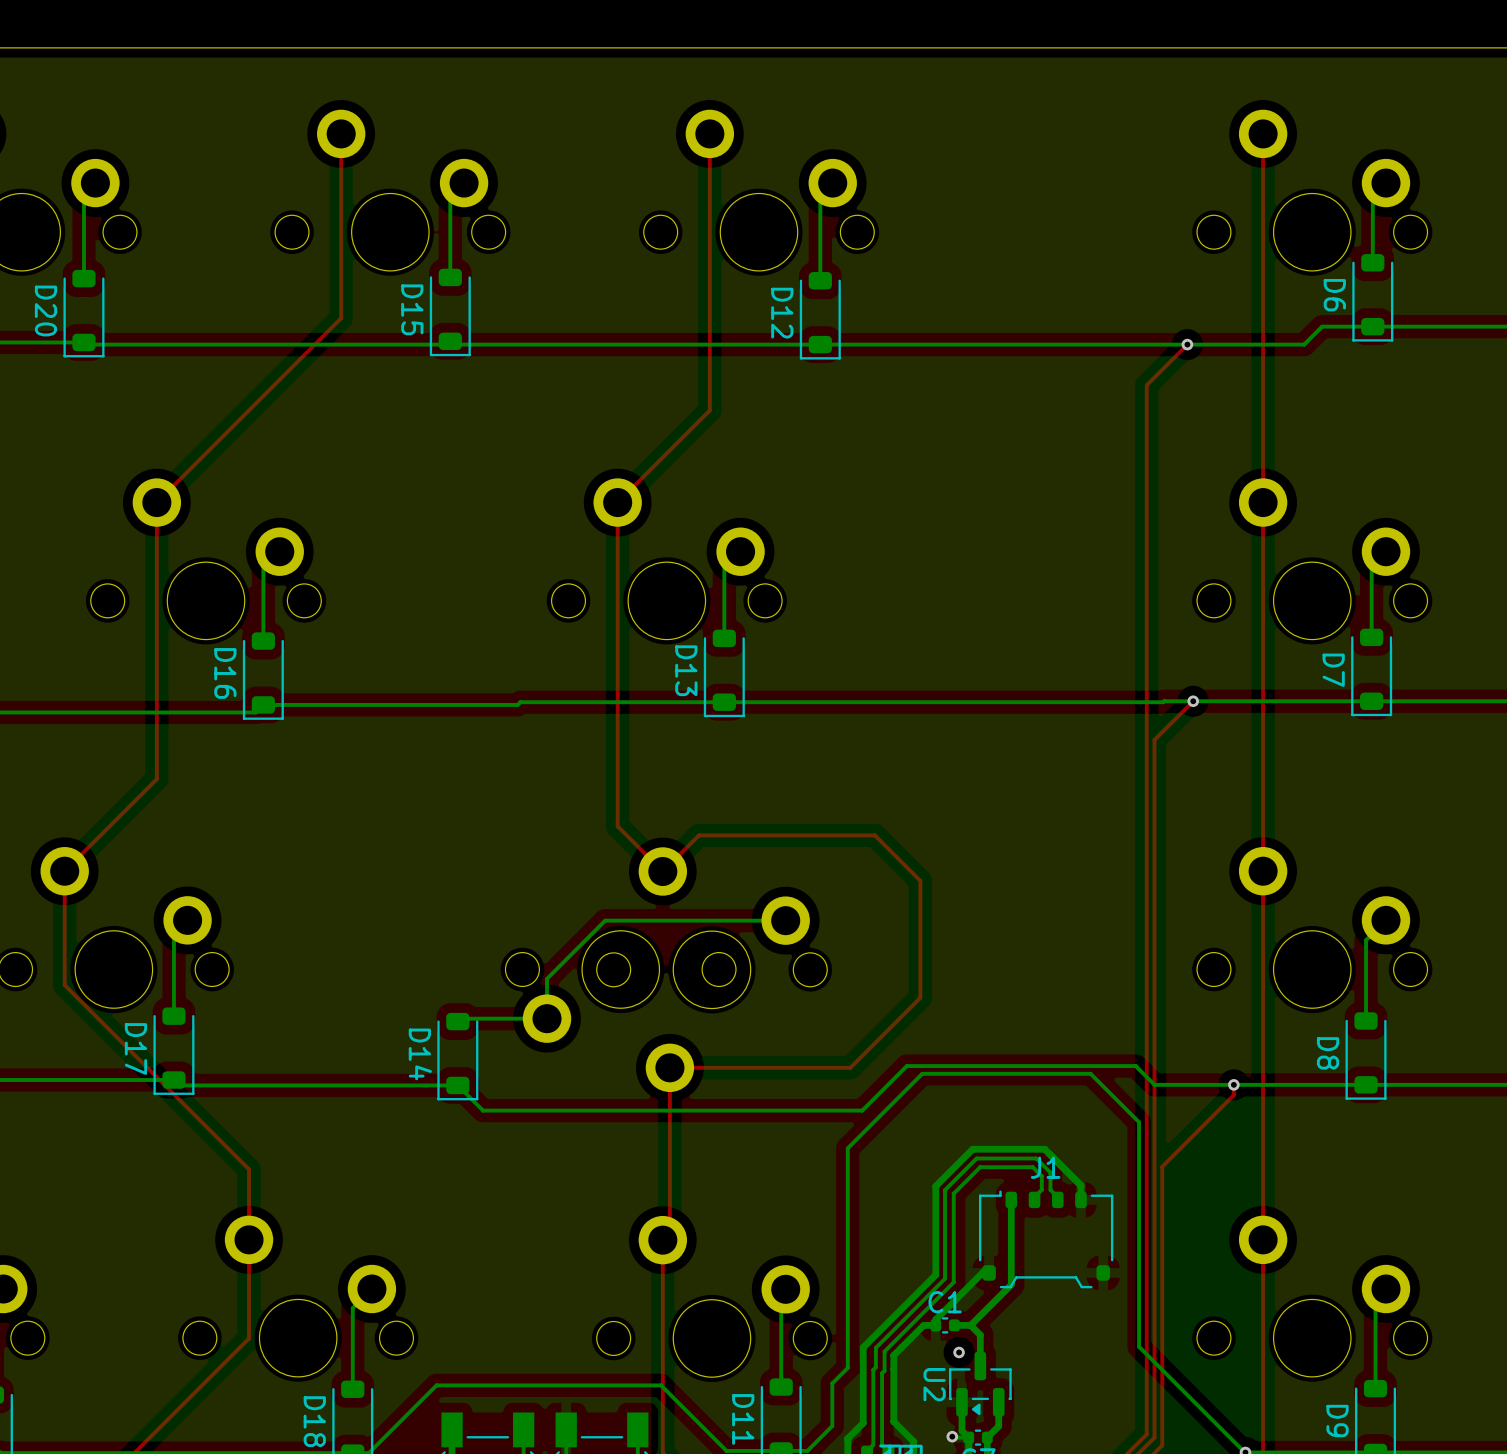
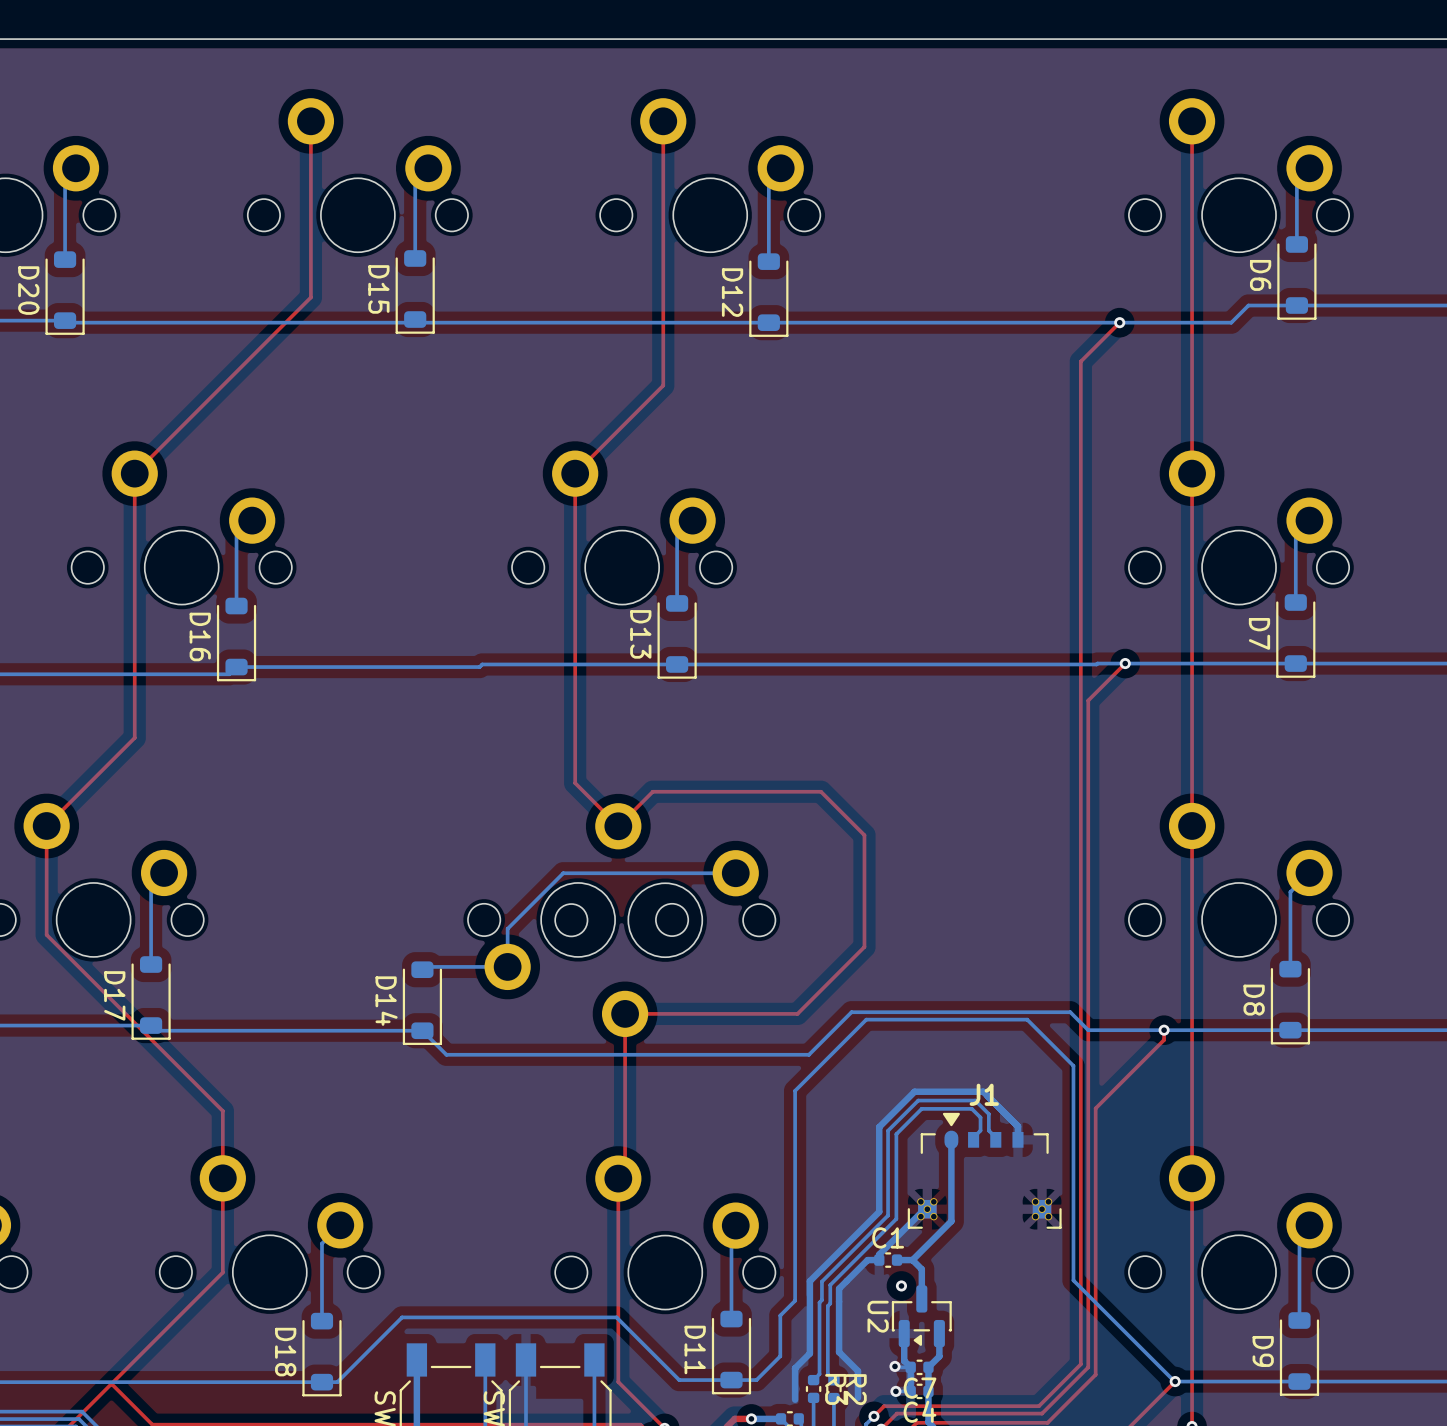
J1 footprint: [979, 1190, 1114, 1289] -> [907, 1112, 1062, 1229]

